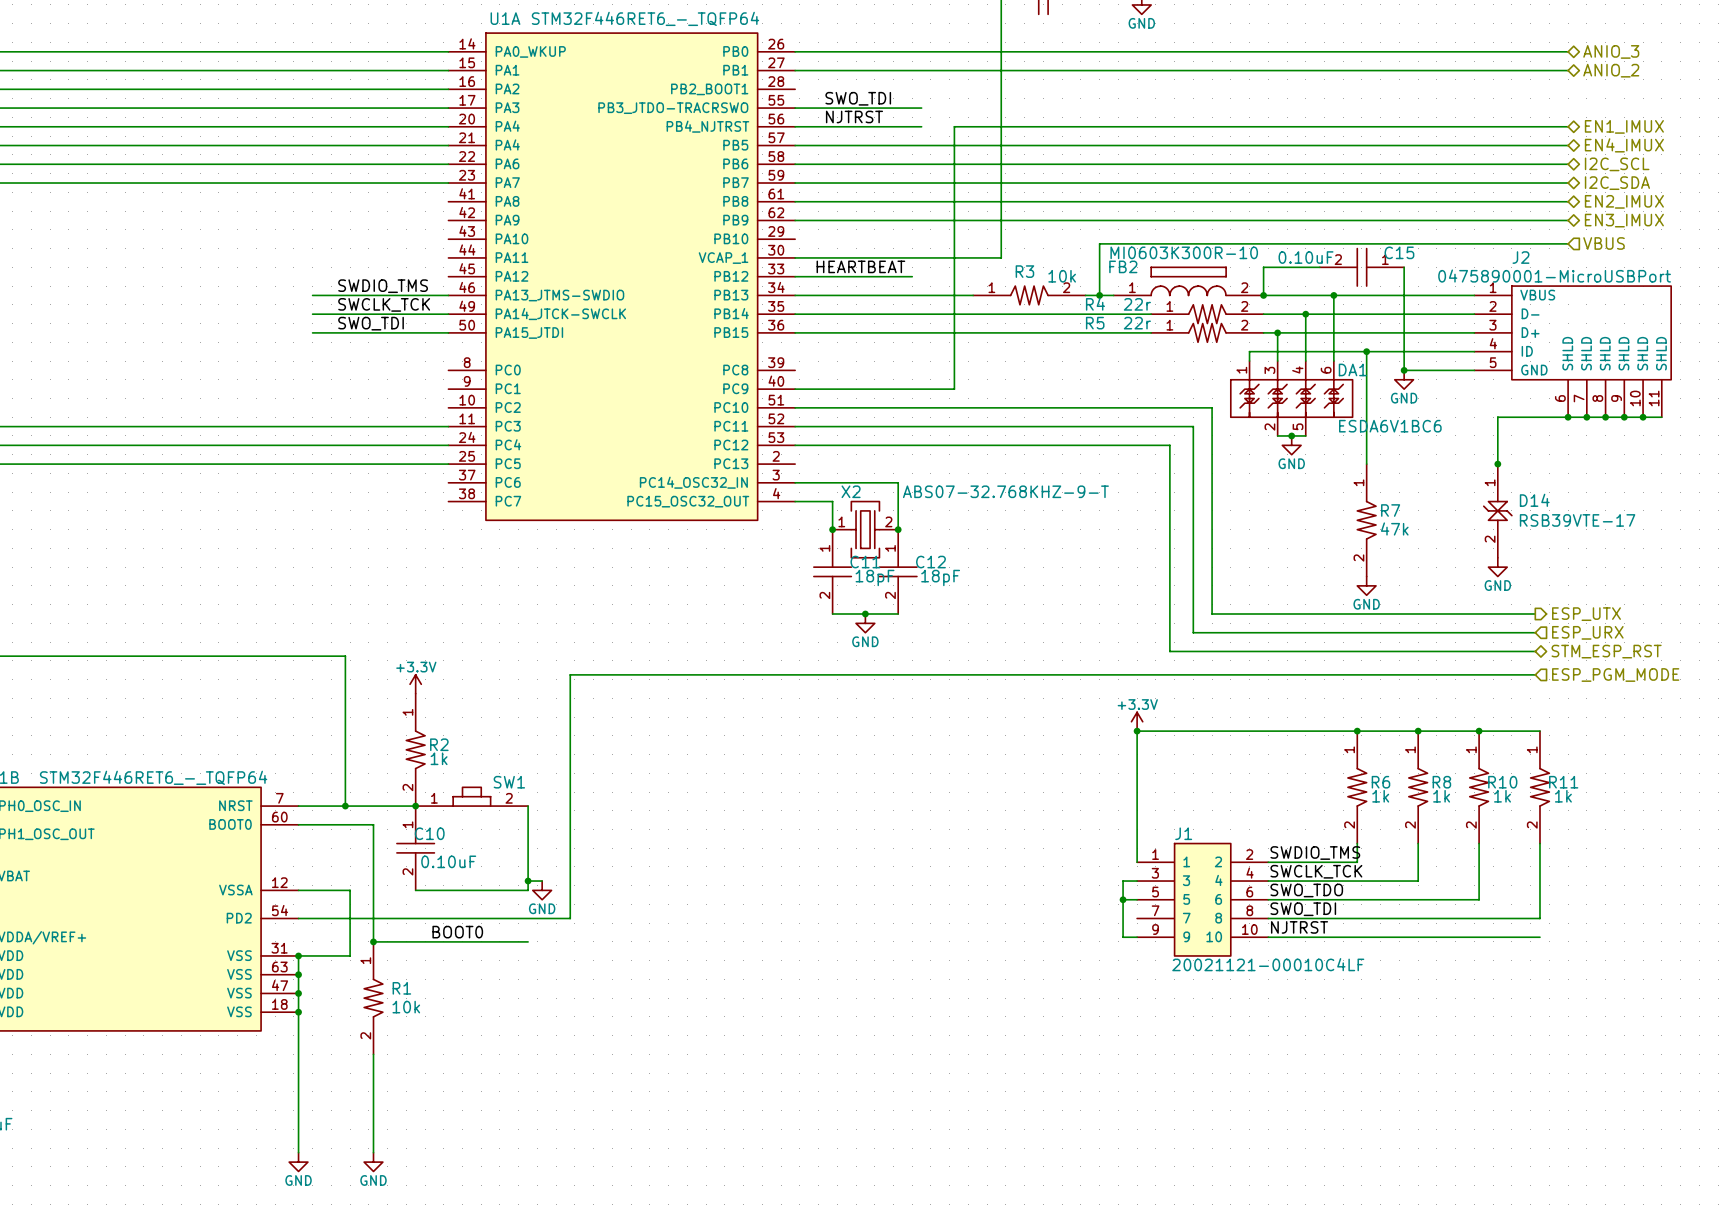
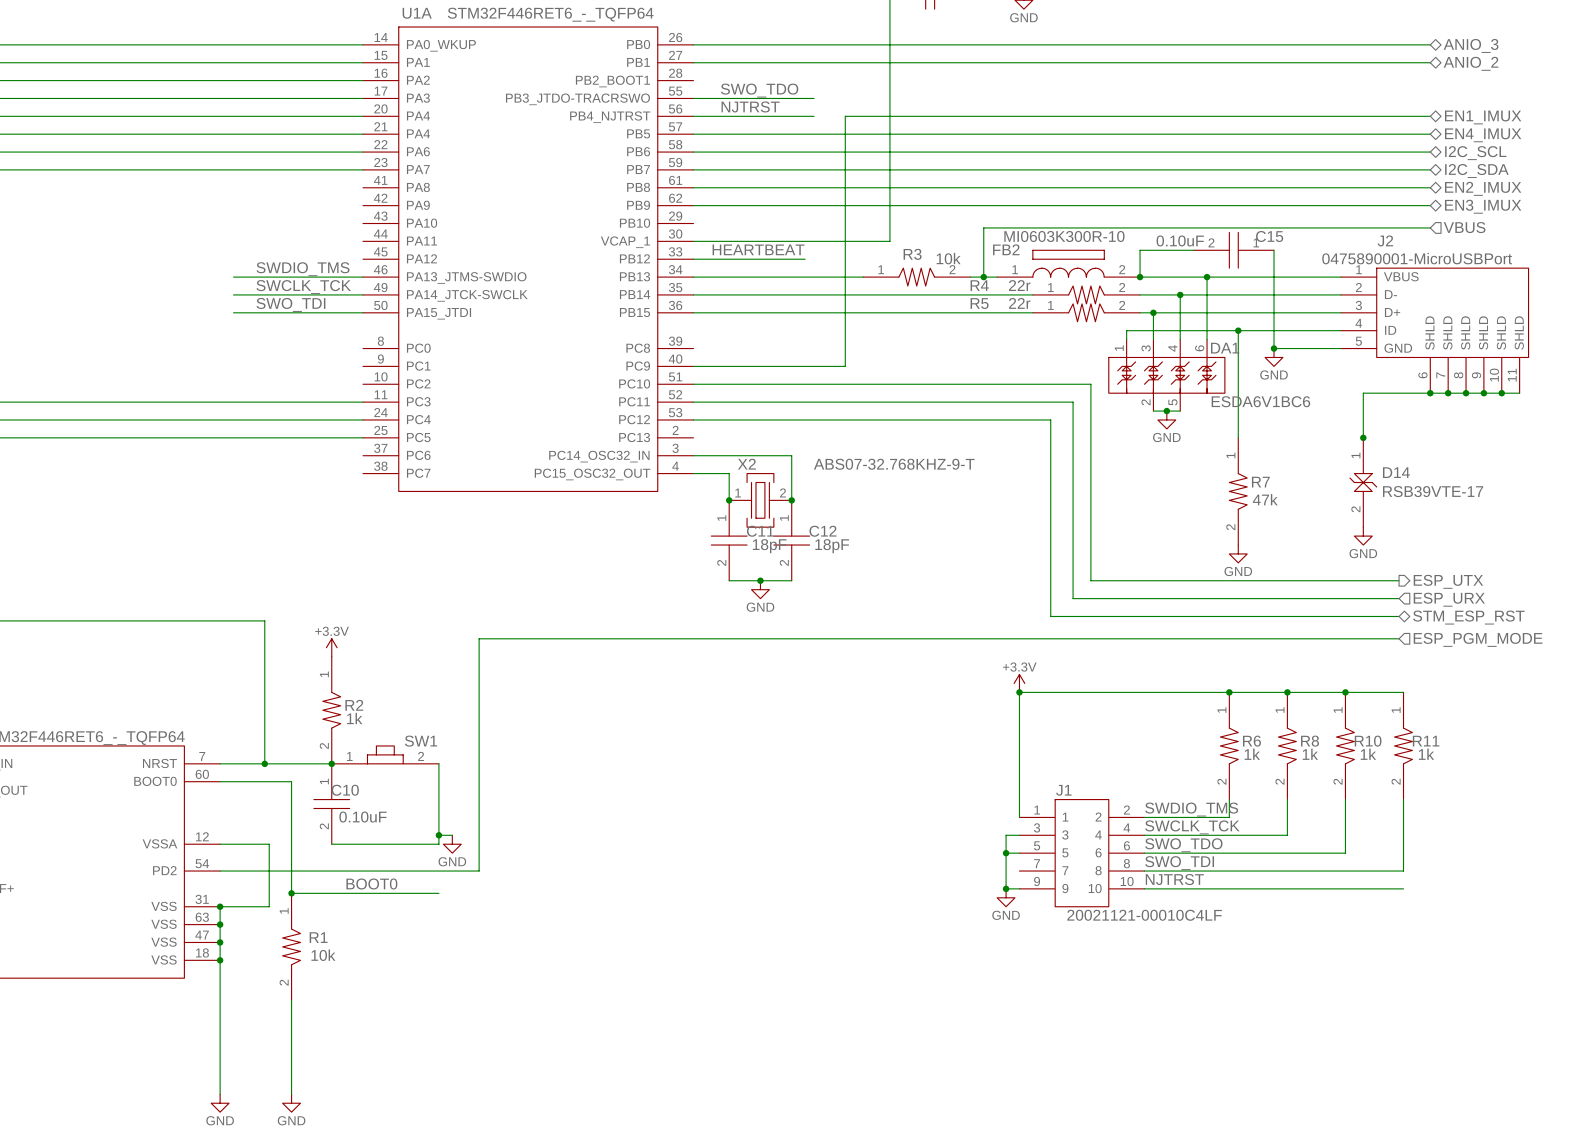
label: SWO_TDI (858, 98) -> SWO_TDO (759, 90)
junction: none -> (1006, 888)
power symbol: none -> GND (1006, 897)

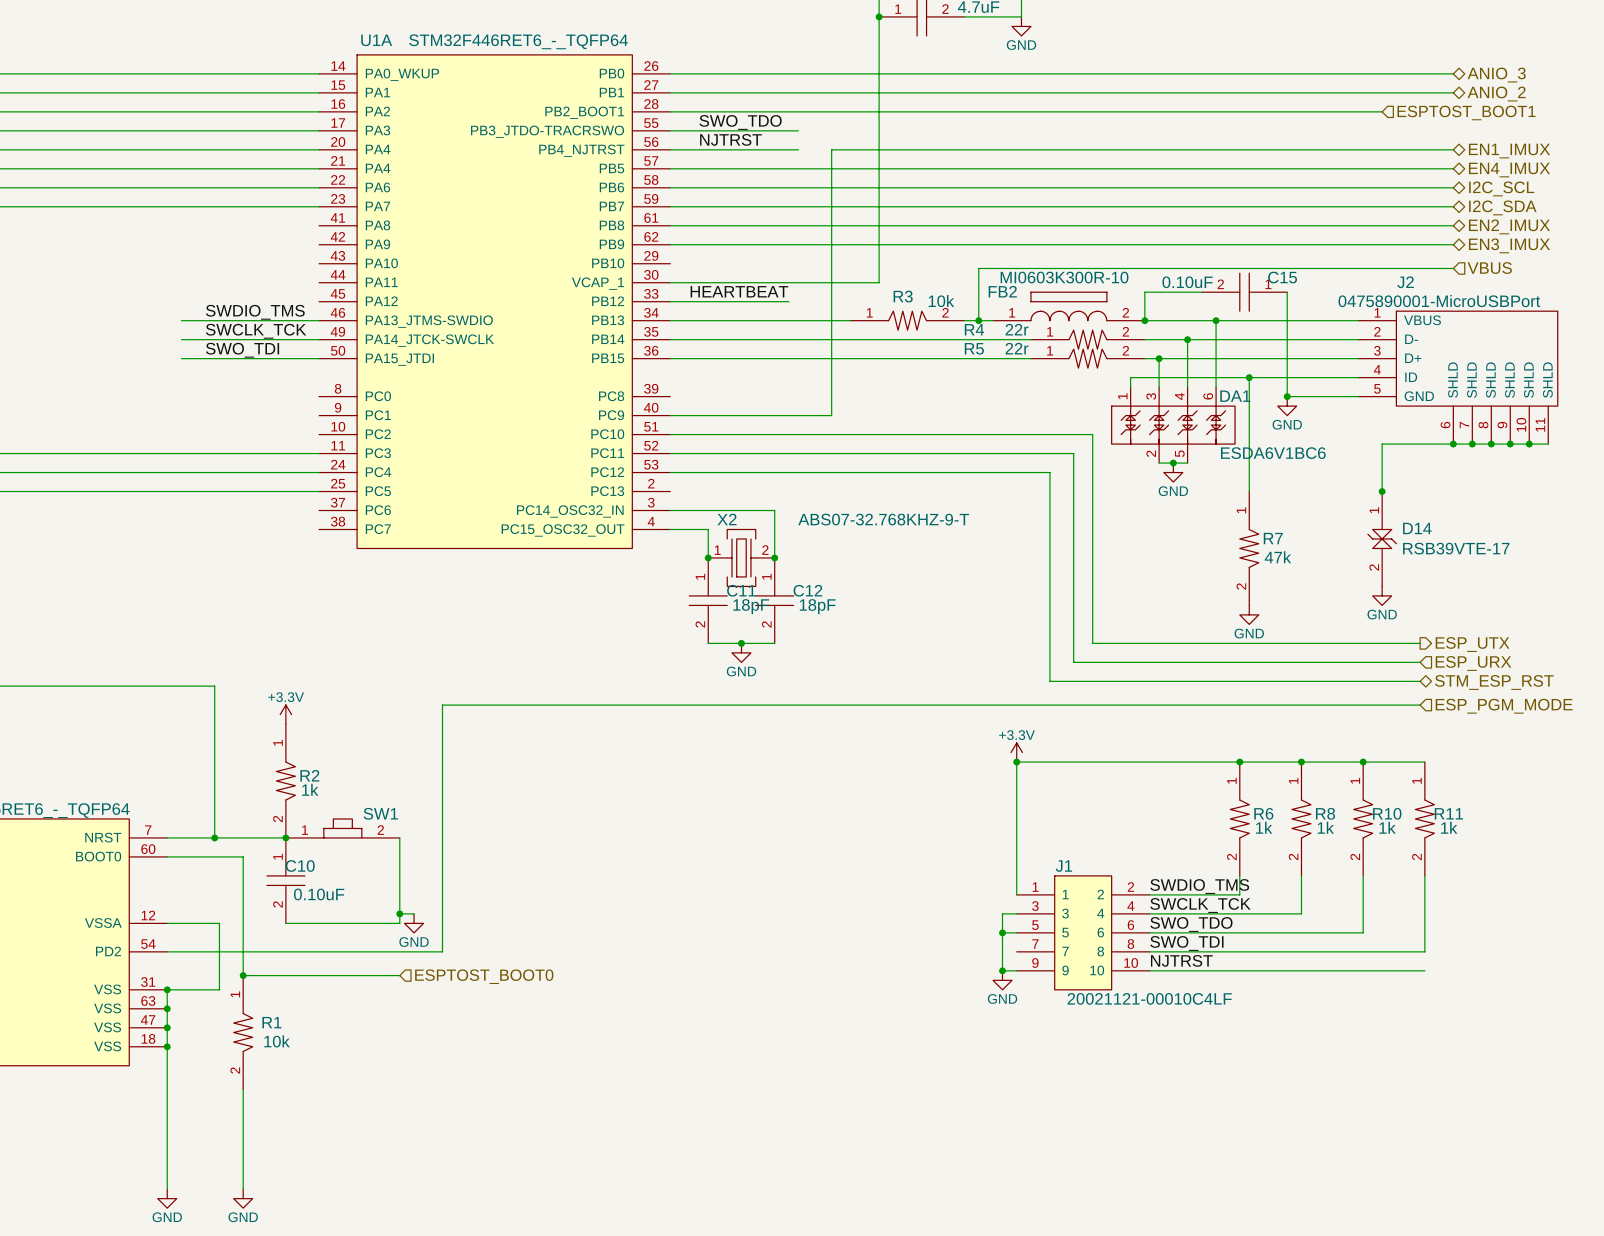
wire: none -> (670, 111) (1382, 111)
hierarchical label: none -> ESPTOST_BOOT1 (1466, 112)
label: BOOT0 (371, 883) -> none
hierarchical label: none -> ESPTOST_BOOT0 (484, 976)

